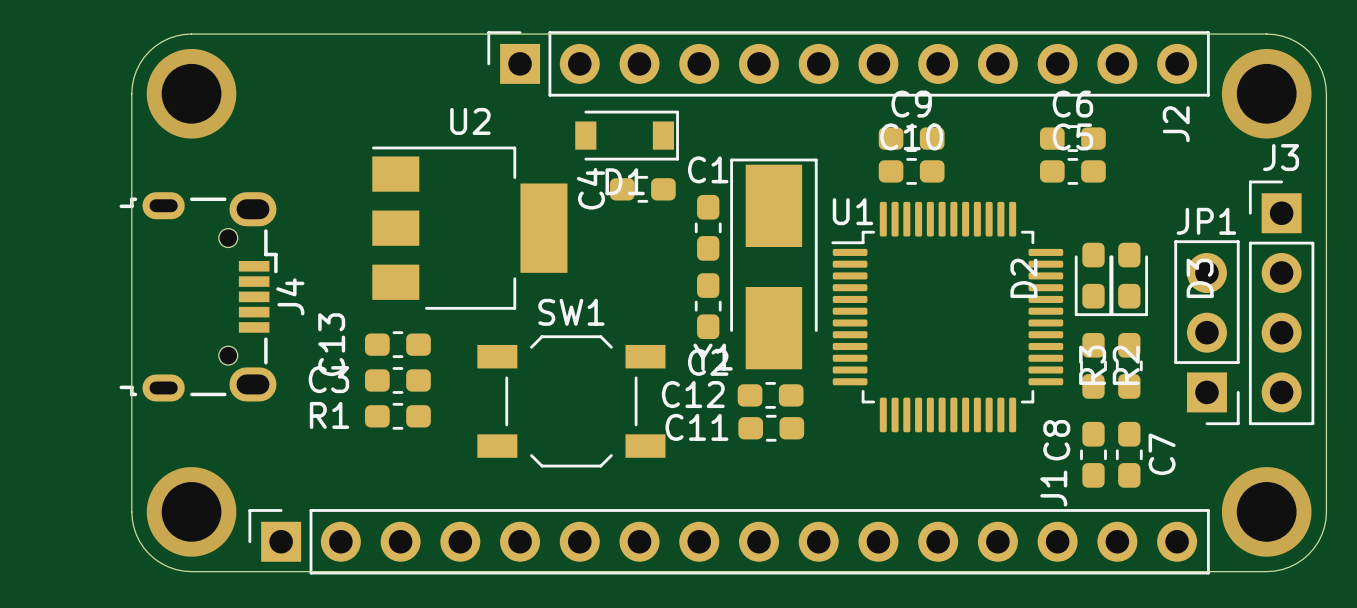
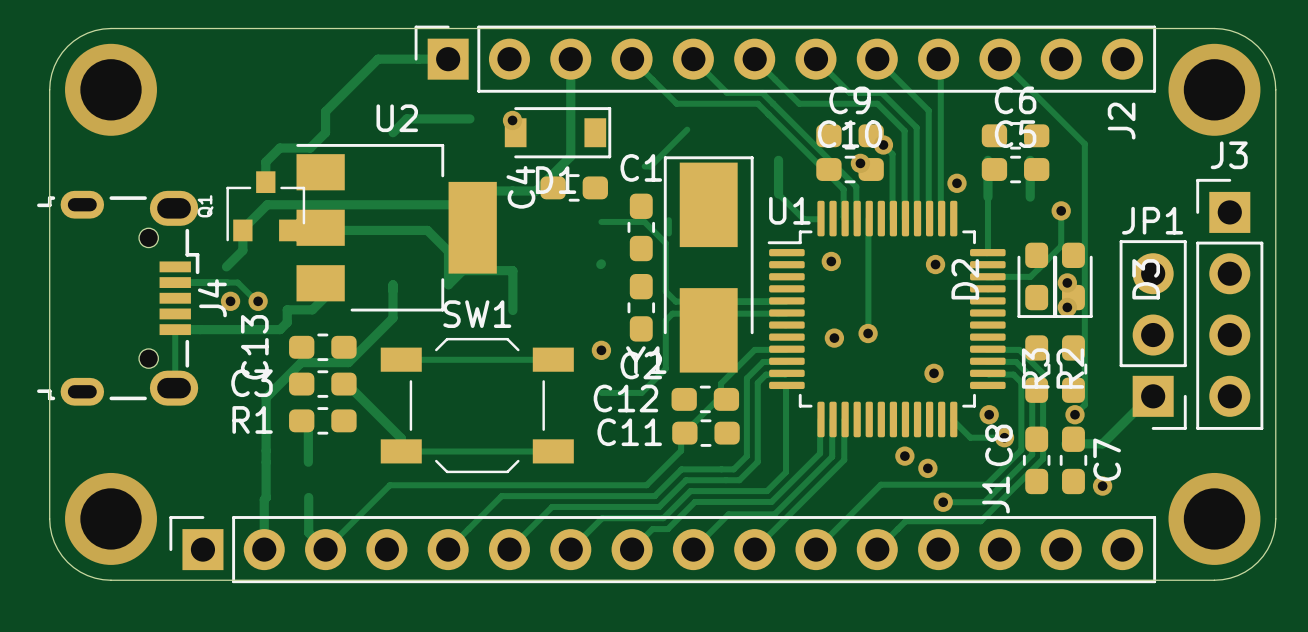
track: none -> (448, 59) (378, 59) (325, 111) (325, 132) (310, 148) (279, 148) (265, 162) (265, 182)
track: none -> (570, 59) (570, 156) (536, 190) (488, 190) (475, 204) (267, 204) (242, 229) (242, 250) (226, 266)
track: none -> (632, 59) (676, 103) (757, 103) (843, 189) (844, 219)
track: none -> (693, 59) (727, 92) (763, 92)
track: none -> (754, 59) (799, 103) (877, 103) (904, 130) (904, 219)
track: none -> (815, 59) (849, 92) (881, 92) (916, 127) (916, 219)
track: none -> (877, 59) (928, 110) (928, 219)
track: none -> (938, 59) (940, 61) (940, 219)
track: none -> (999, 59) (1084, 144) (1084, 404) (1075, 414)
track: none -> (762, 92) (856, 186) (856, 219)
track: none -> (469, 118) (406, 118) (392, 132)
via: none -> (512, 120)
track: none -> (687, 129) (650, 166) (644, 166)
track: none -> (883, 144) (892, 154) (892, 219)
via: none -> (883, 144)
track: none -> (778, 160) (778, 194) (803, 219) (820, 219)
track: none -> (987, 160) (986, 253)
track: none -> (1030, 160) (1030, 197)
via: none -> (860, 163)
via: none -> (956, 183)
Q1: none -> (265, 206)
track: none -> (1061, 210) (1061, 246) (1030, 276) (986, 277)
via: none -> (1061, 210)
track: none -> (868, 219) (868, 333)
track: none -> (668, 220) (668, 233)
track: none -> (601, 221) (644, 221) (665, 243) (665, 291) (675, 301) (786, 301)
track: none -> (288, 230) (427, 230) (448, 251) (448, 284) (462, 270) (512, 270)
via: none -> (831, 261)
track: none -> (601, 263) (600, 264)
via: none -> (935, 264)
track: none -> (512, 270) (512, 310)
track: none -> (175, 282) (237, 282) (258, 301)
via: none -> (1067, 282)
track: none -> (337, 284) (312, 309) (287, 309) (287, 322) (280, 329) (175, 329) (174, 388)
track: none -> (392, 284) (392, 318) (348, 362) (301, 362) (266, 397) (266, 497)
via: none -> (230, 301)
via: none -> (258, 301)
via: none -> (1067, 307)
track: none -> (786, 313) (672, 313) (665, 320) (665, 368) (641, 392) (601, 392)
SW1 name position: SW1 (571, 312) -> SW1 (477, 314)
via: none -> (868, 333)
SW1 footprint: [477, 335, 666, 468] -> [380, 337, 574, 474]
via: none -> (834, 338)
via: none -> (601, 350)
track: none -> (786, 349) (754, 349) (720, 383) (720, 396) (681, 436) (681, 450) (646, 485) (389, 485) (325, 549) (308, 532) (308, 497)
track: none -> (986, 349) (1019, 349) (1043, 373) (1043, 458) (980, 521) (905, 521) (877, 549)
track: none -> (544, 358) (391, 359)
track: none -> (786, 361) (763, 361) (746, 378) (746, 456) (733, 469) (681, 469) (654, 496) (501, 496) (448, 549)
track: none -> (986, 361) (1016, 361) (1032, 378) (1032, 454) (984, 502) (943, 502)
track: none -> (786, 374) (766, 374) (757, 382) (757, 461) (739, 480) (686, 480) (659, 506) (552, 506) (509, 549)
via: none -> (934, 373)
track: none -> (986, 374) (1013, 374) (1021, 382) (1021, 449) (986, 484) (880, 484) (815, 549)
track: none -> (786, 386) (786, 472) (767, 491) (690, 491) (663, 518) (602, 518) (570, 549)
track: none -> (351, 388) (401, 438) (401, 451)
track: none -> (1153, 396) (1150, 396) (1102, 443) (1065, 443)
via: none -> (989, 414)
via: none -> (1075, 414)
track: none -> (820, 420) (820, 453) (771, 501) (695, 501) (667, 529) (652, 529) (632, 549)
track: none -> (832, 420) (832, 456) (774, 514) (728, 514) (693, 549)
track: none -> (844, 420) (844, 460) (754, 549)
track: none -> (952, 420) (970, 437) (1004, 437)
track: none -> (309, 423) (308, 462)
via: none -> (1004, 437)
track: none -> (391, 448) (391, 451) (543, 451)
via: none -> (904, 456)
via: none -> (927, 468)
via: none -> (1102, 486)
track: none -> (266, 497) (264, 499) (264, 549)
via: none -> (943, 502)

